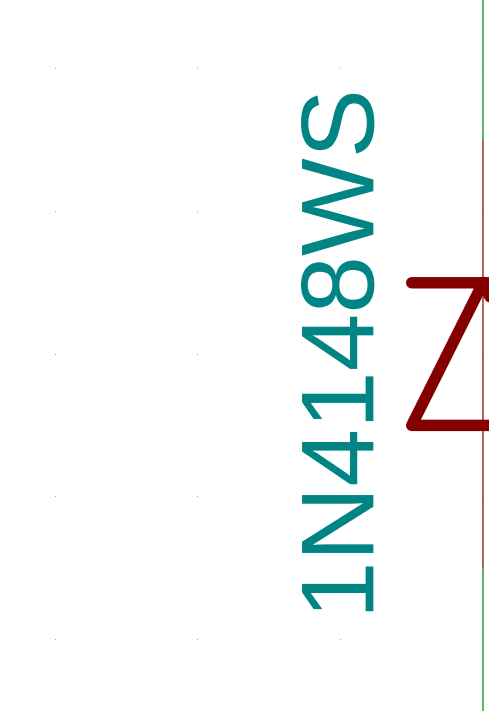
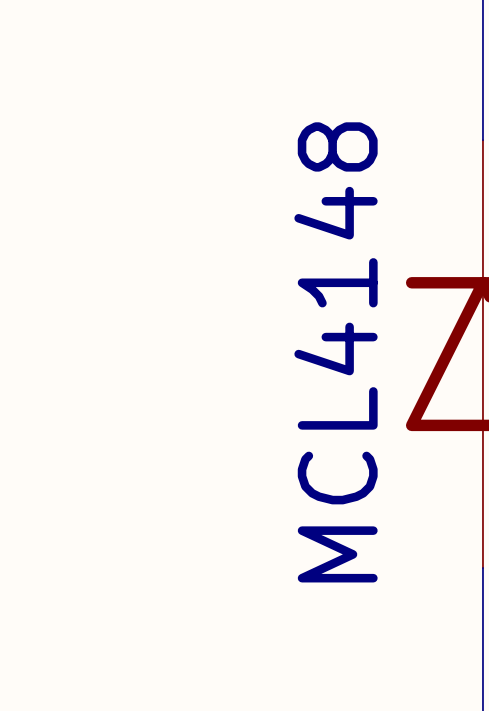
part value: 1N4148WS (337, 352) -> MCL4148 (336, 352)

